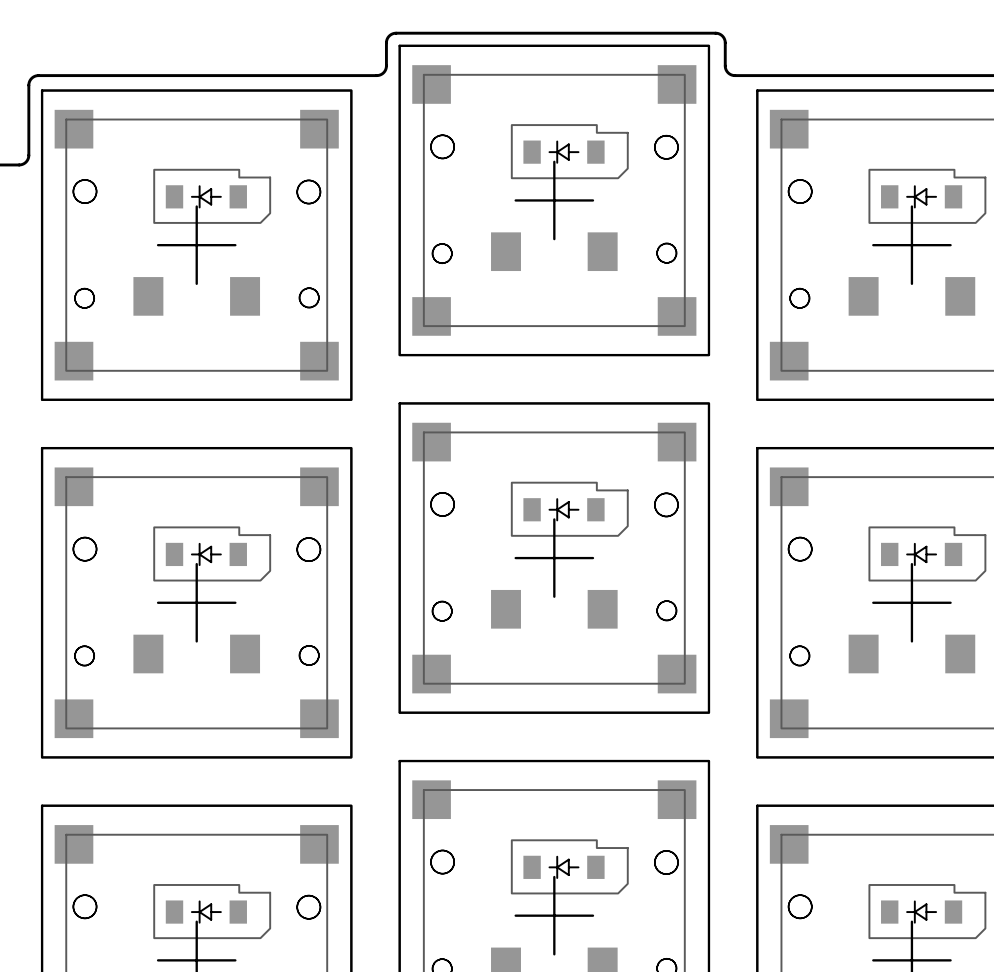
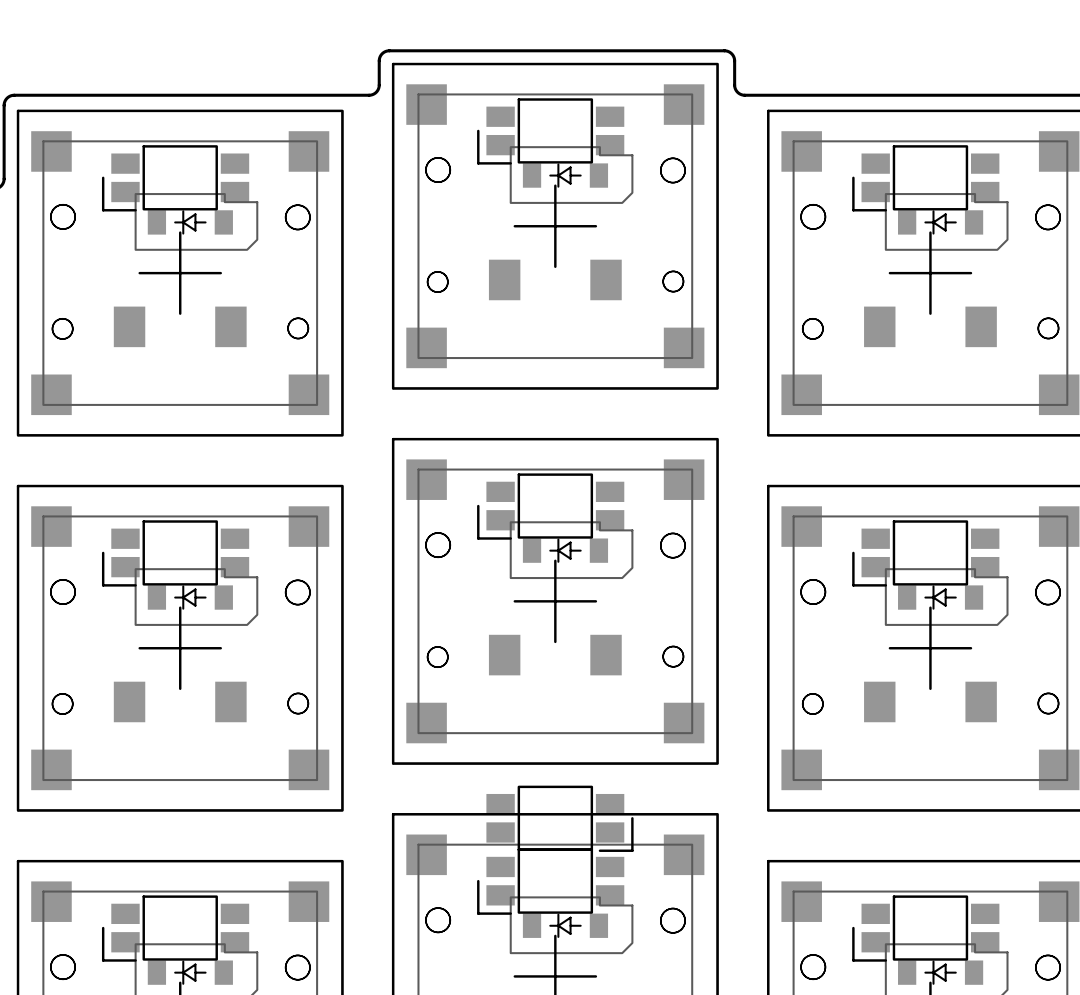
part: none -> (550, 131)
part: none -> (175, 178)
part: none -> (925, 178)
part: none -> (550, 506)
part: none -> (175, 553)
part: none -> (925, 553)
part: none -> (560, 818)
part: none -> (550, 881)
part: none -> (175, 928)
part: none -> (925, 928)

